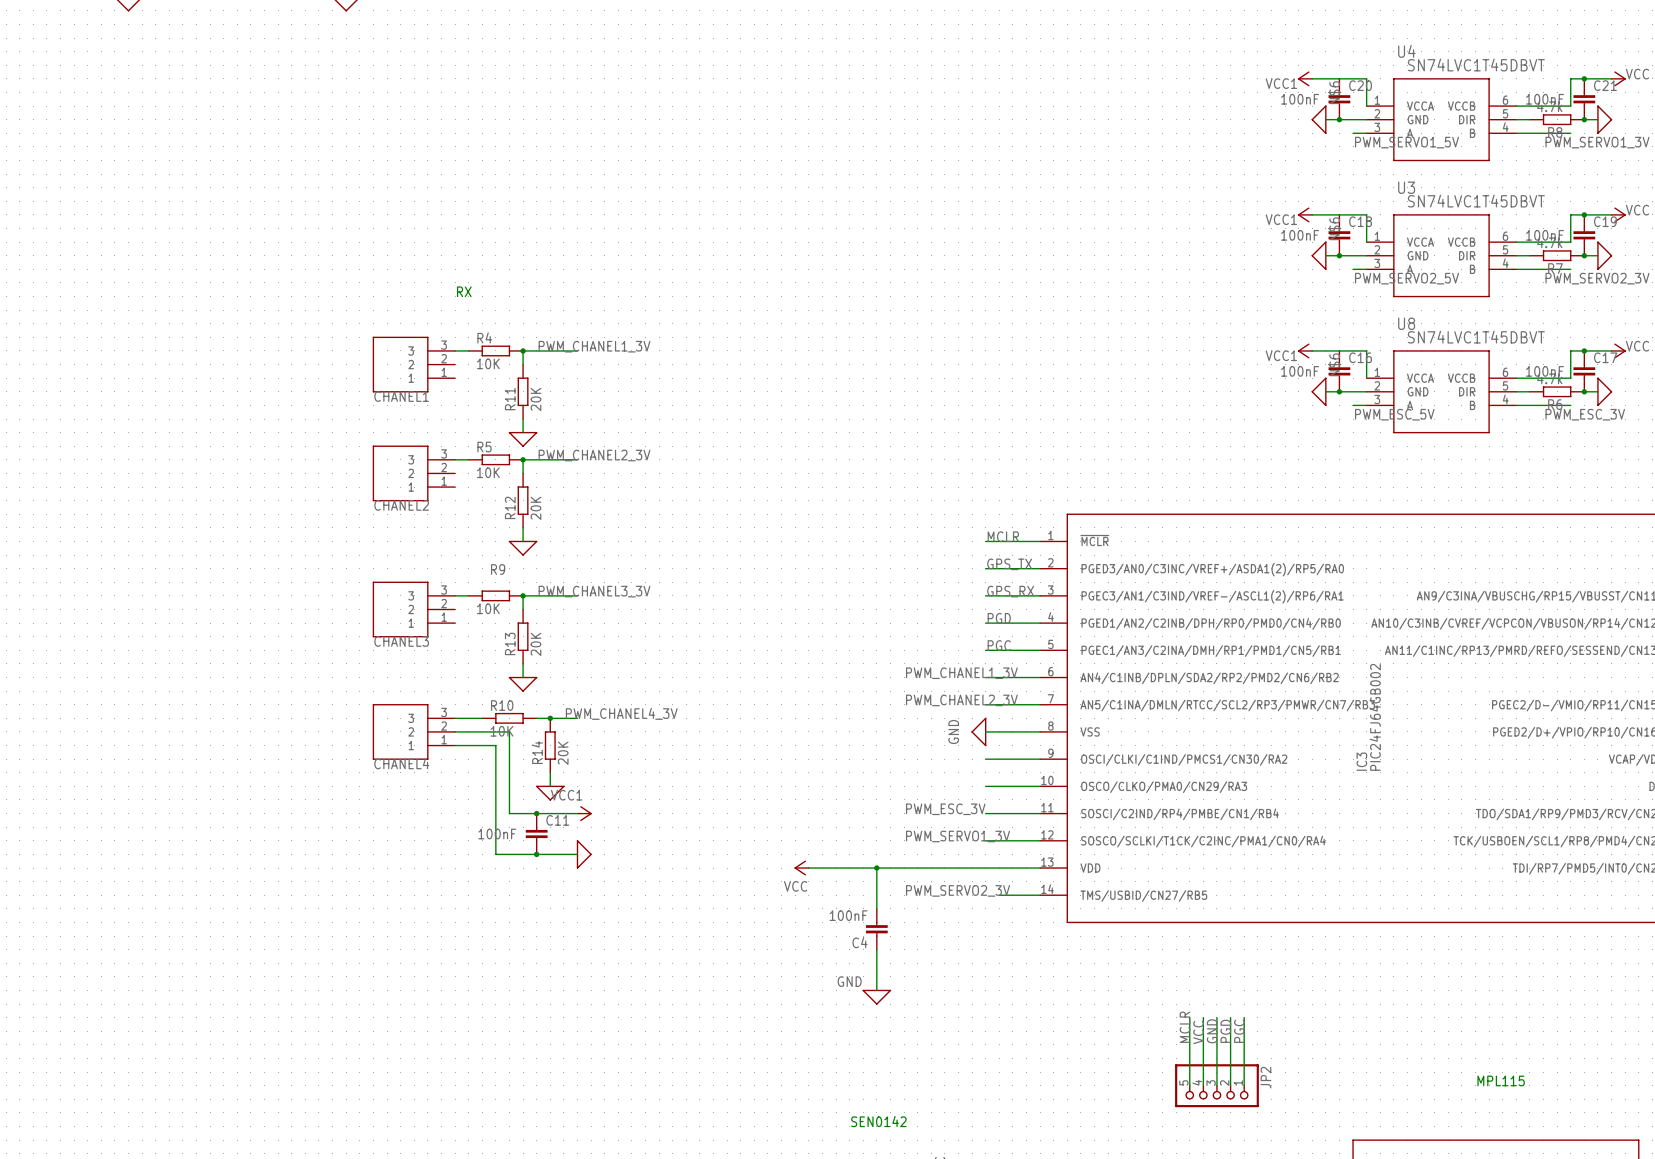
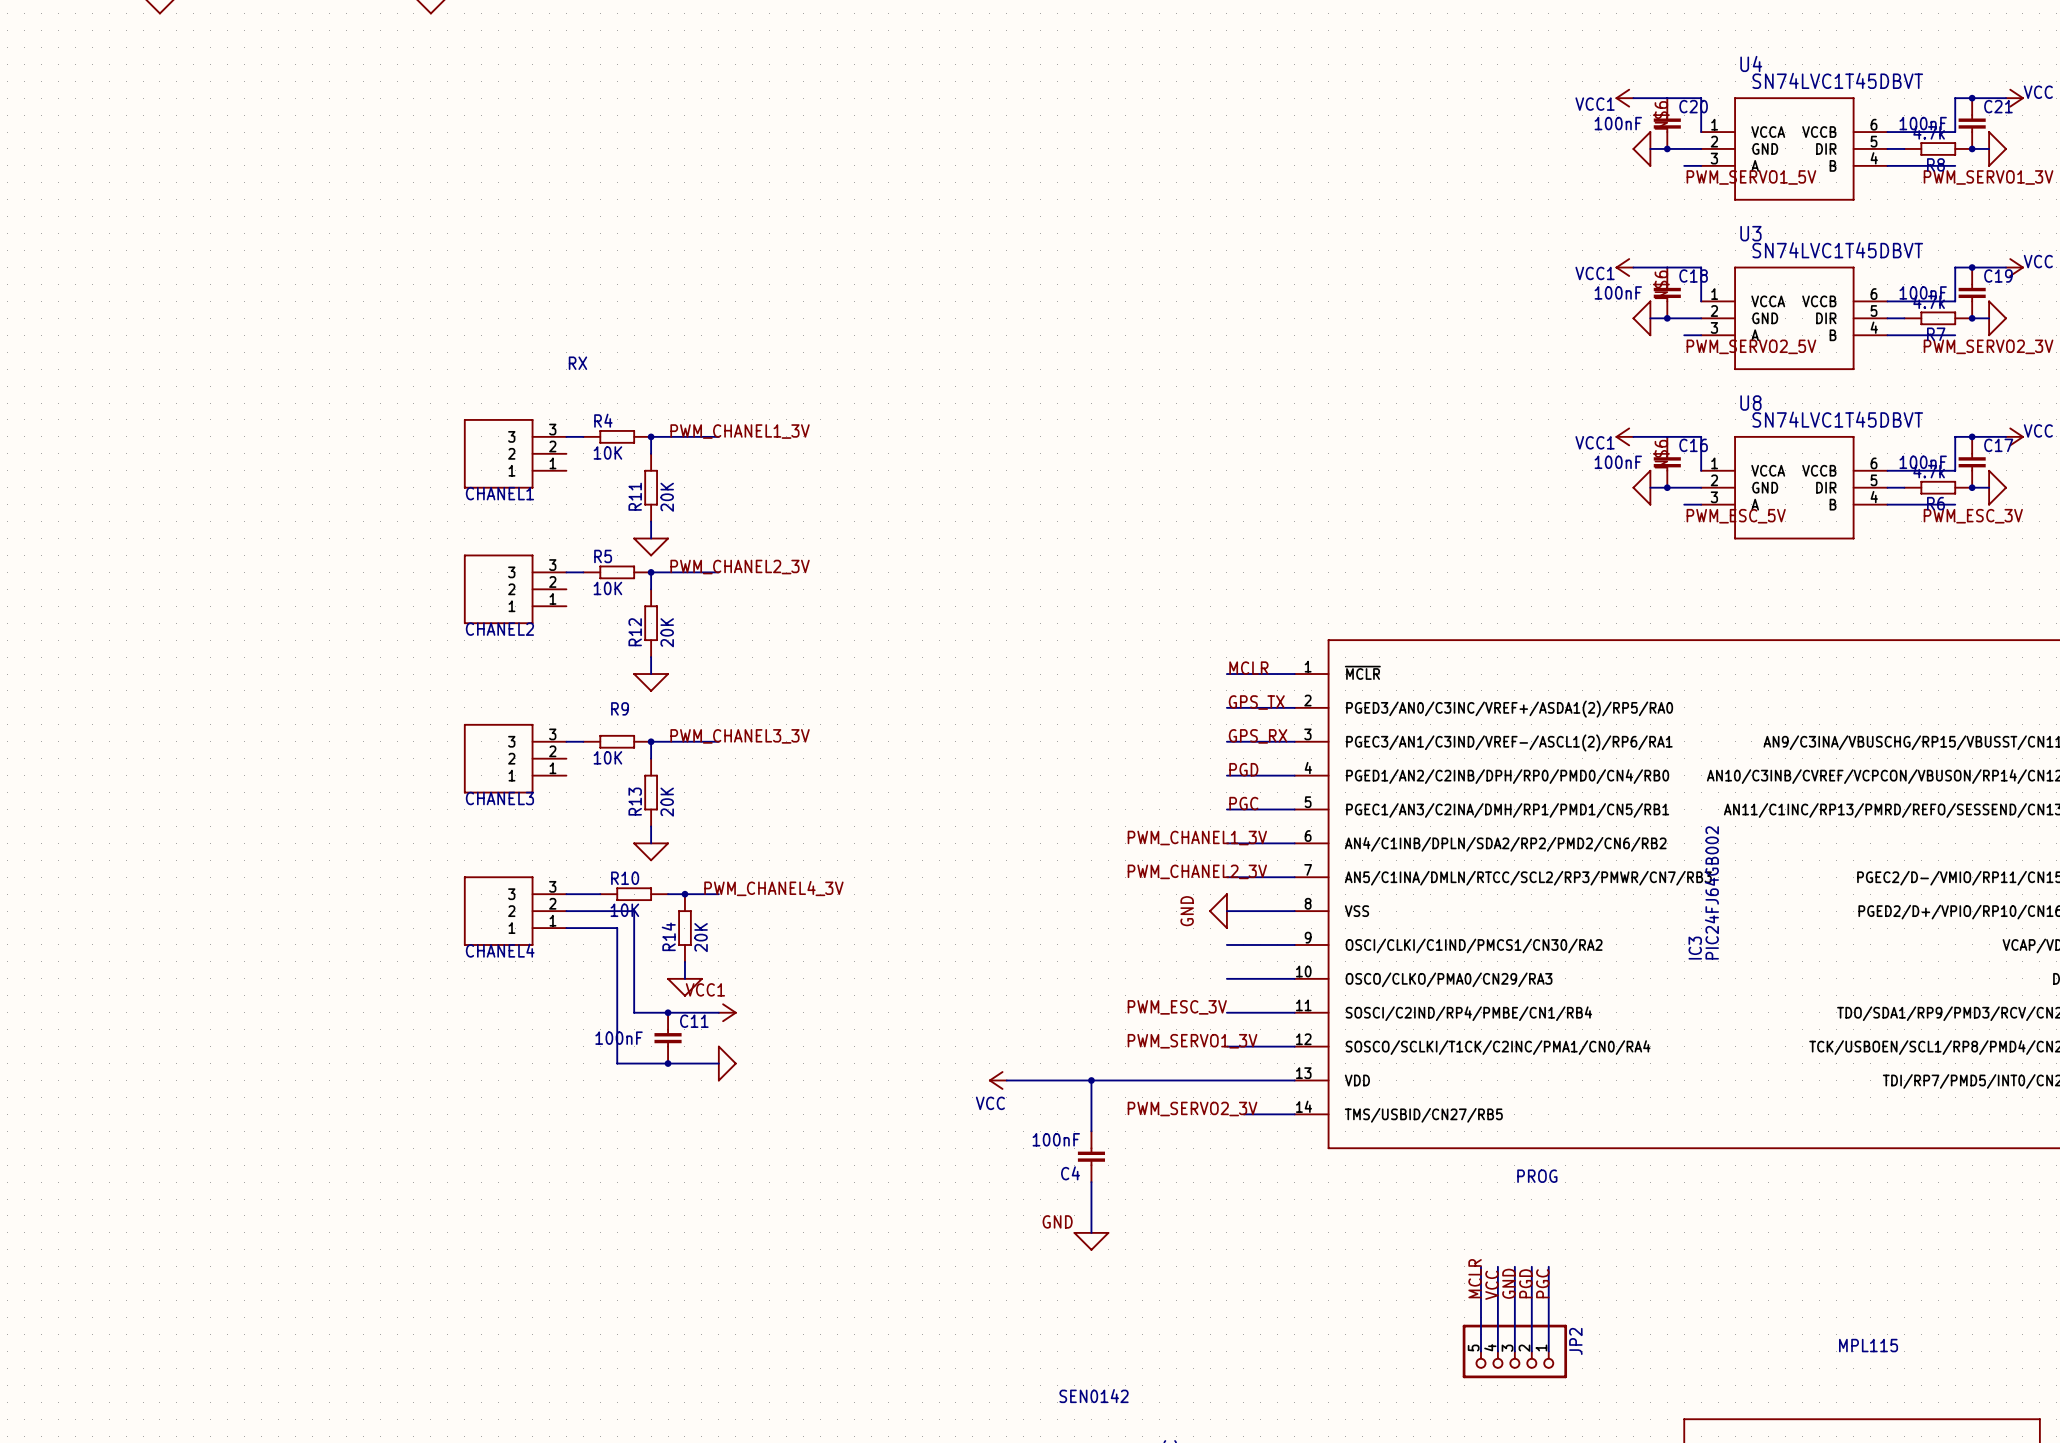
text: none -> PROG (1537, 1176)

